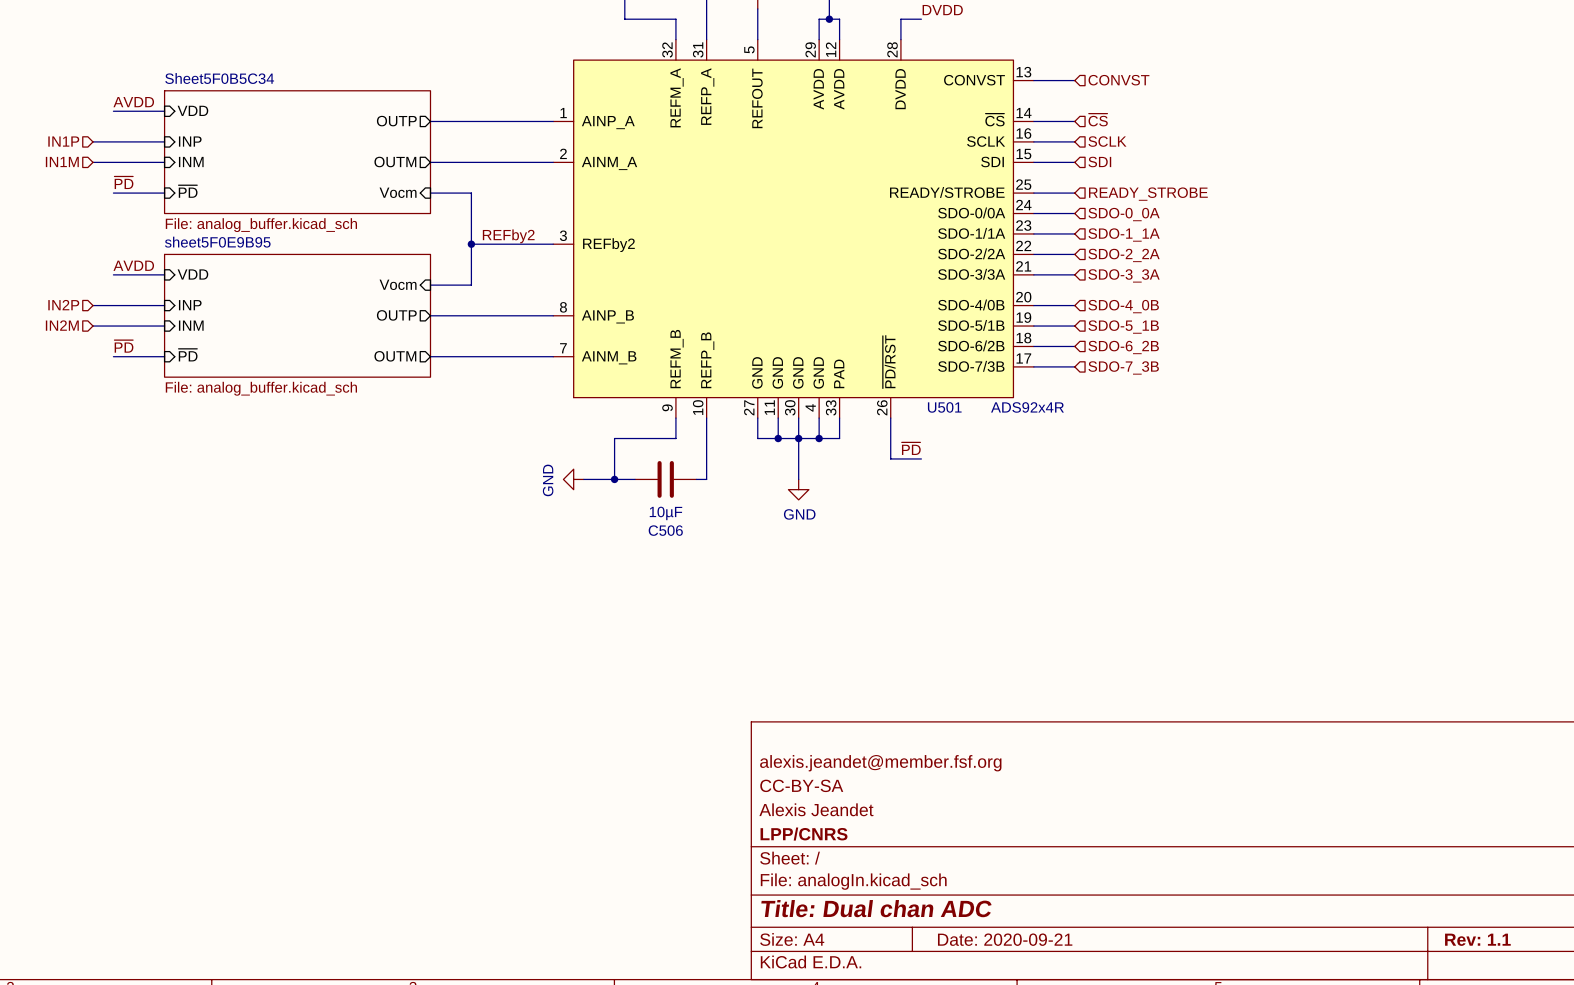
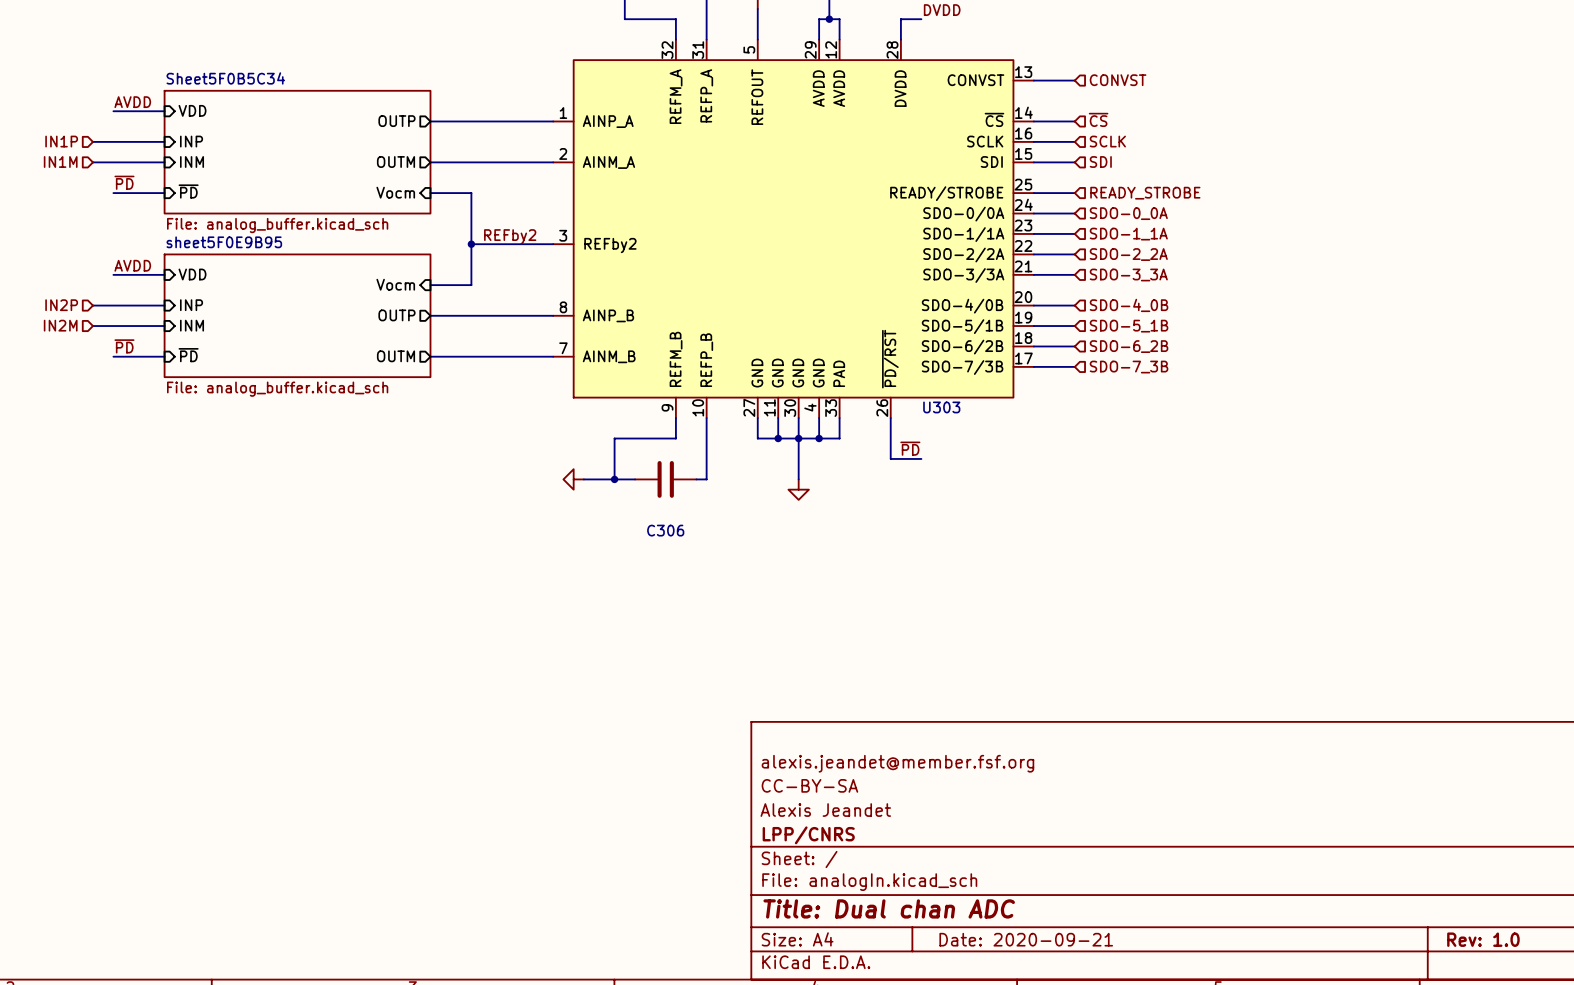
U501 name: U501 (944, 407) -> U303 (941, 407)
U501 value: ADS92x4R (1027, 407) -> none
power symbol text: GND (548, 480) -> none
C506 value: 10µF (665, 513) -> none
power symbol text: GND (799, 514) -> none
C506 name: C506 (665, 530) -> C306 (665, 530)
title block: Rev: 1.1 (1477, 939) -> Rev: 1.0 (1483, 939)

